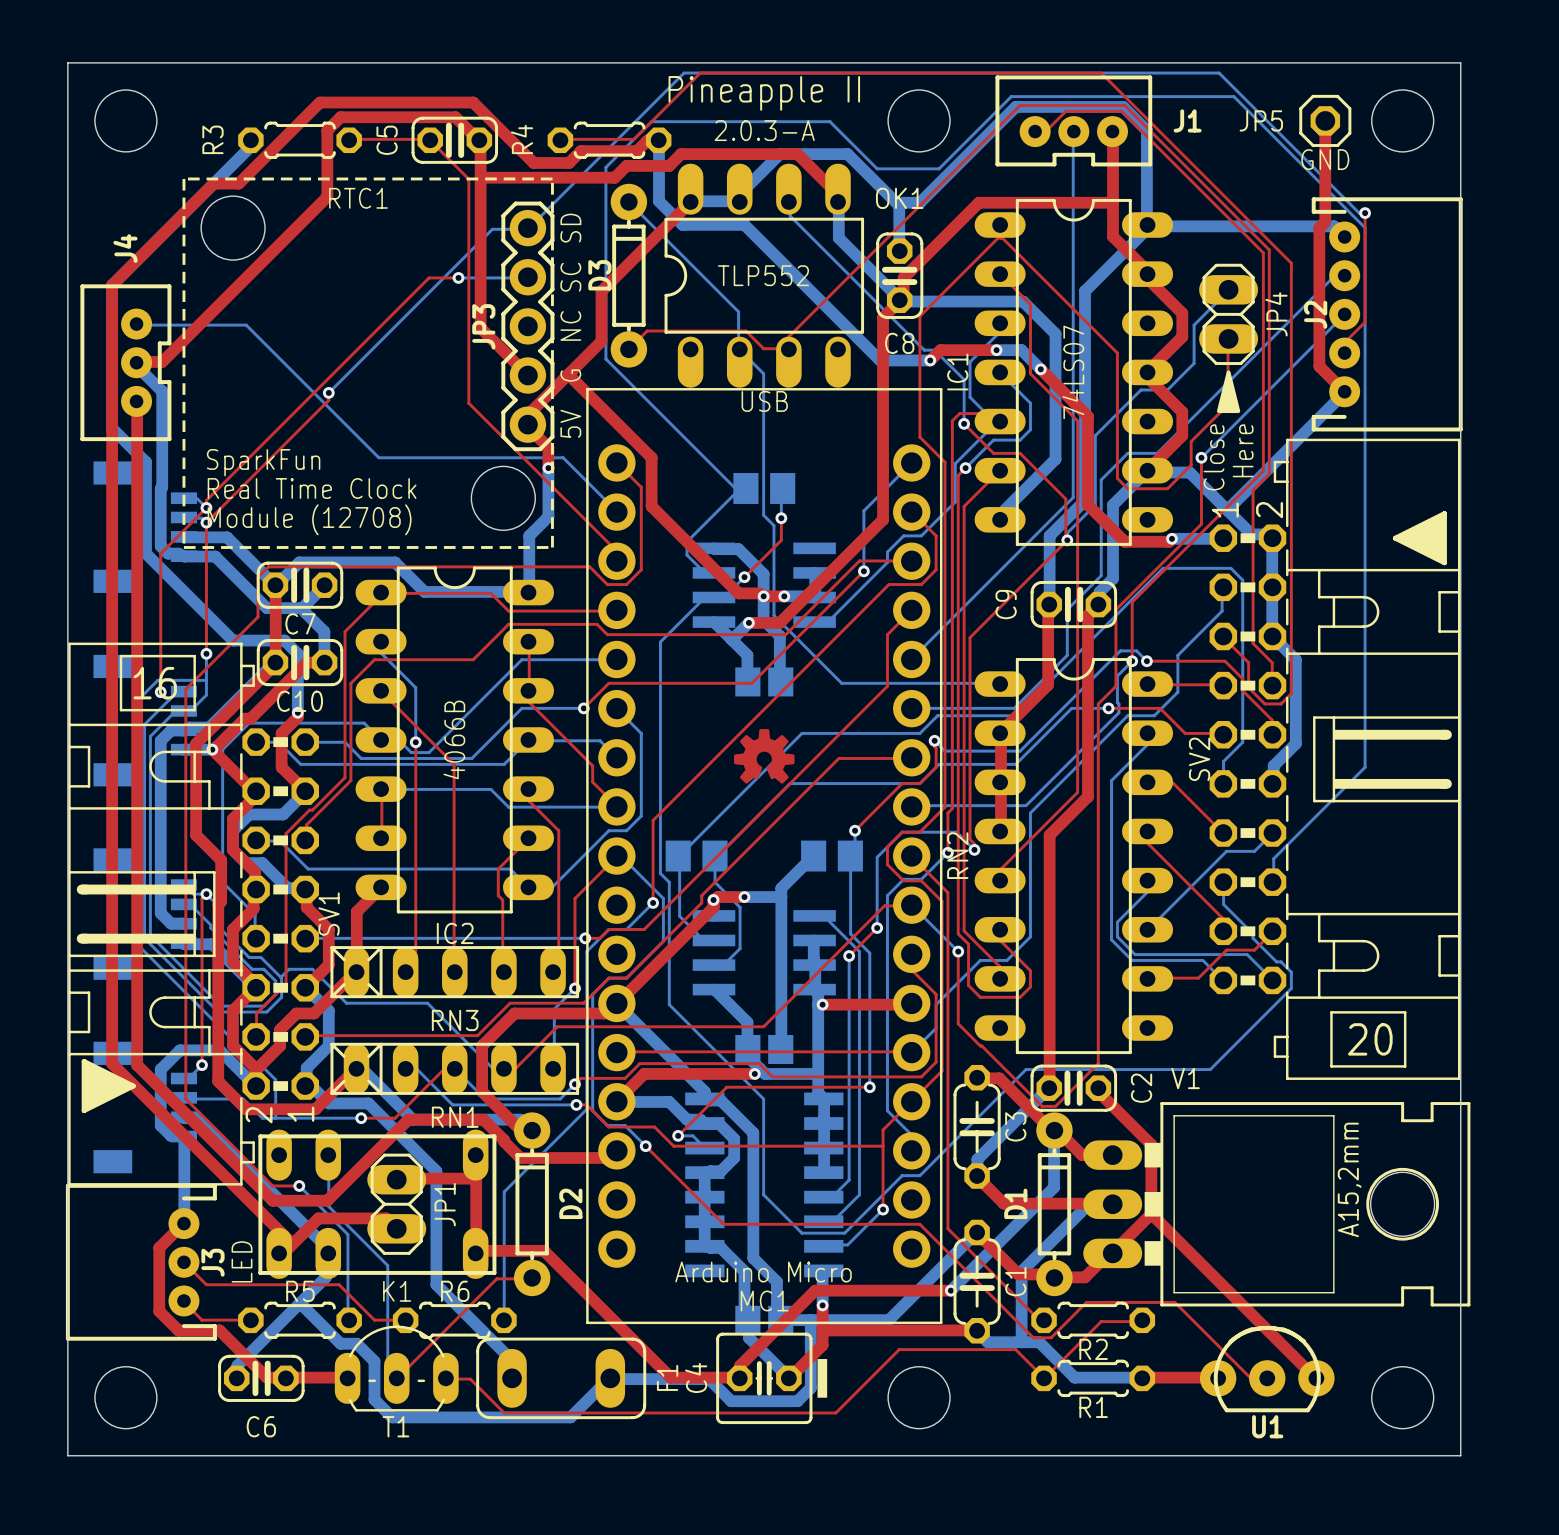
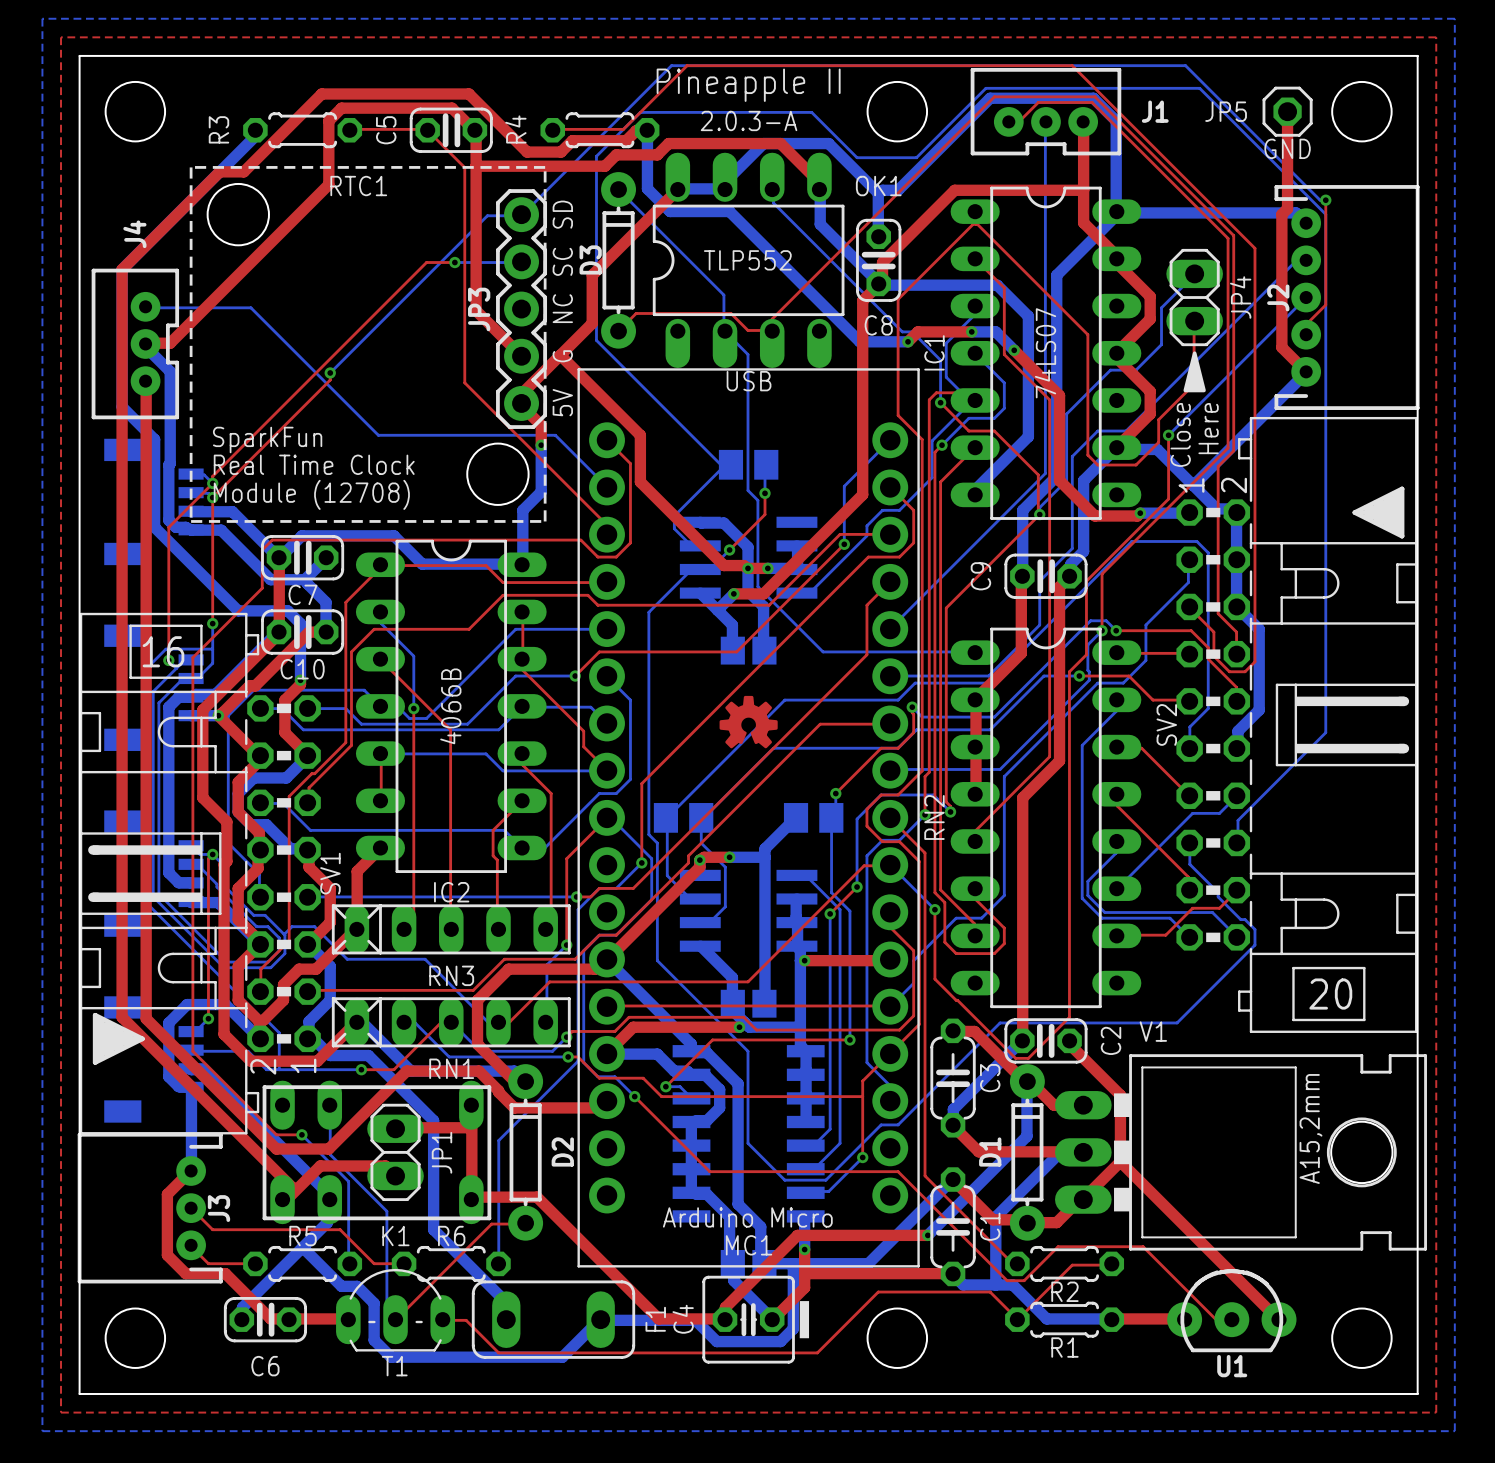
bottom zone outline: none -> (42, 18) (1454, 18) (1454, 1431) (42, 1431) (42, 18)
top zone outline: none -> (61, 37) (1436, 37) (1436, 1412) (61, 1412) (61, 37)
text: LED (241, 1261) -> none

